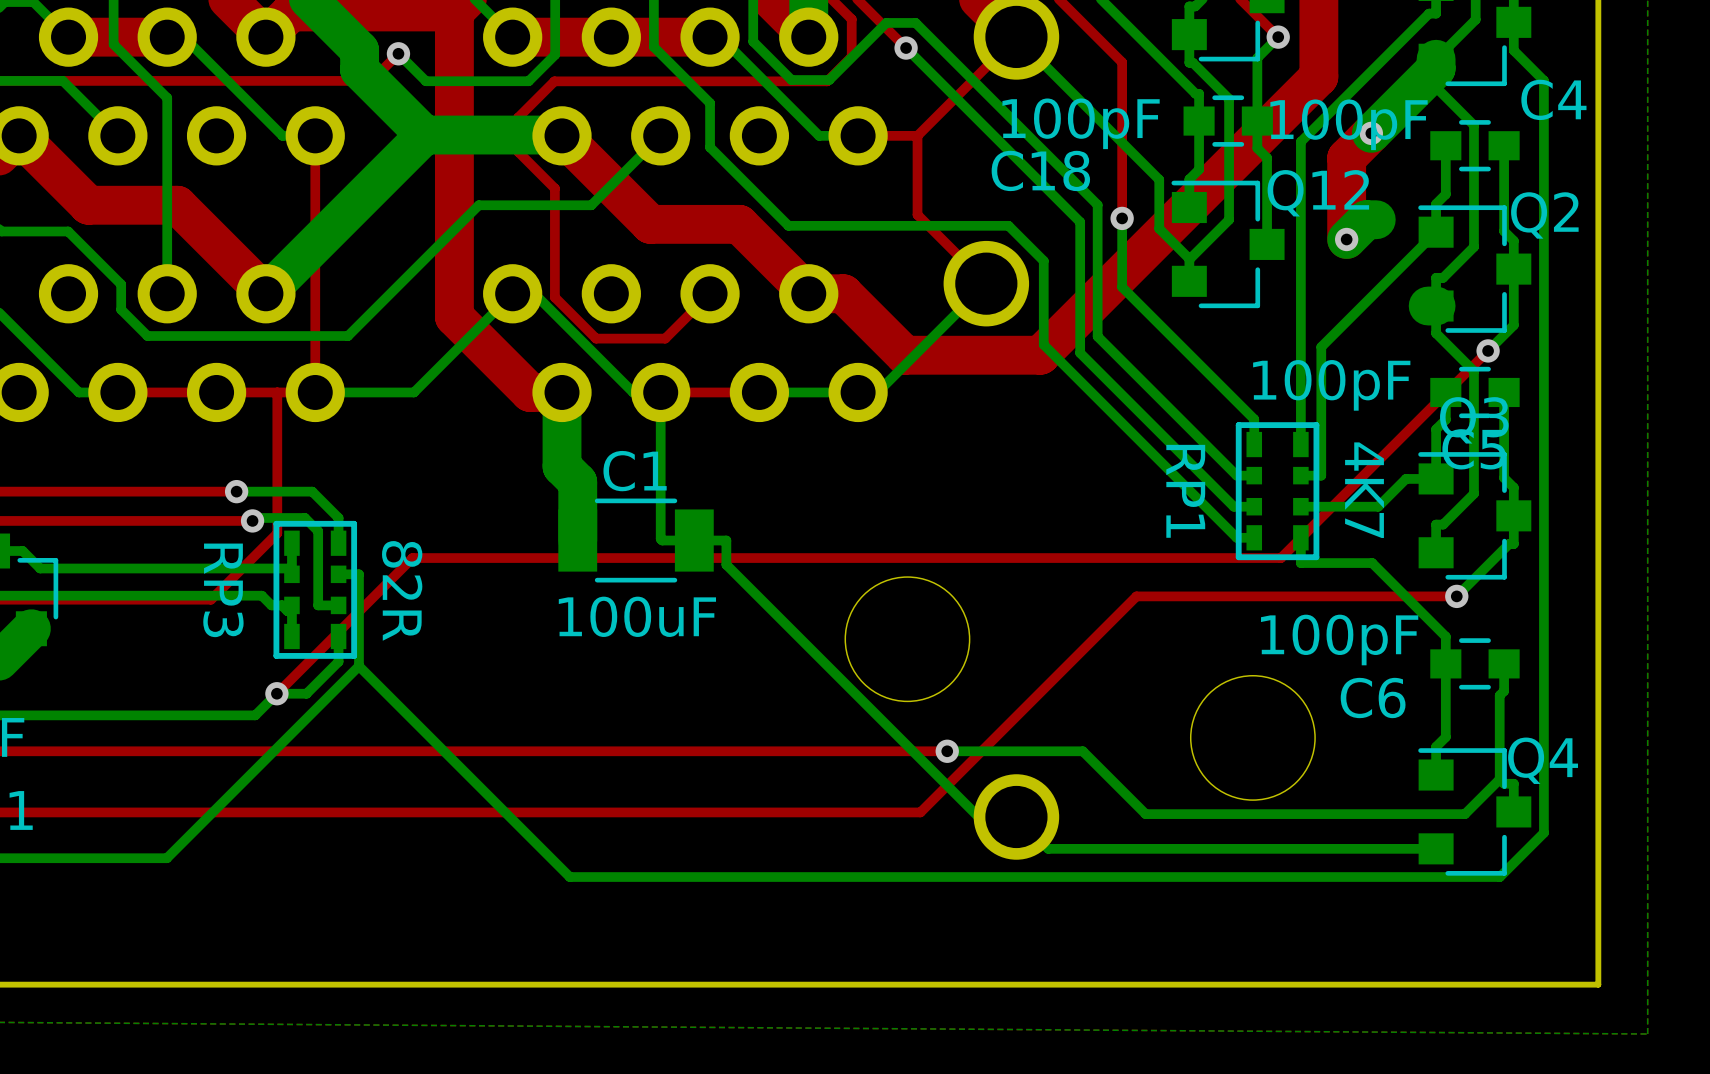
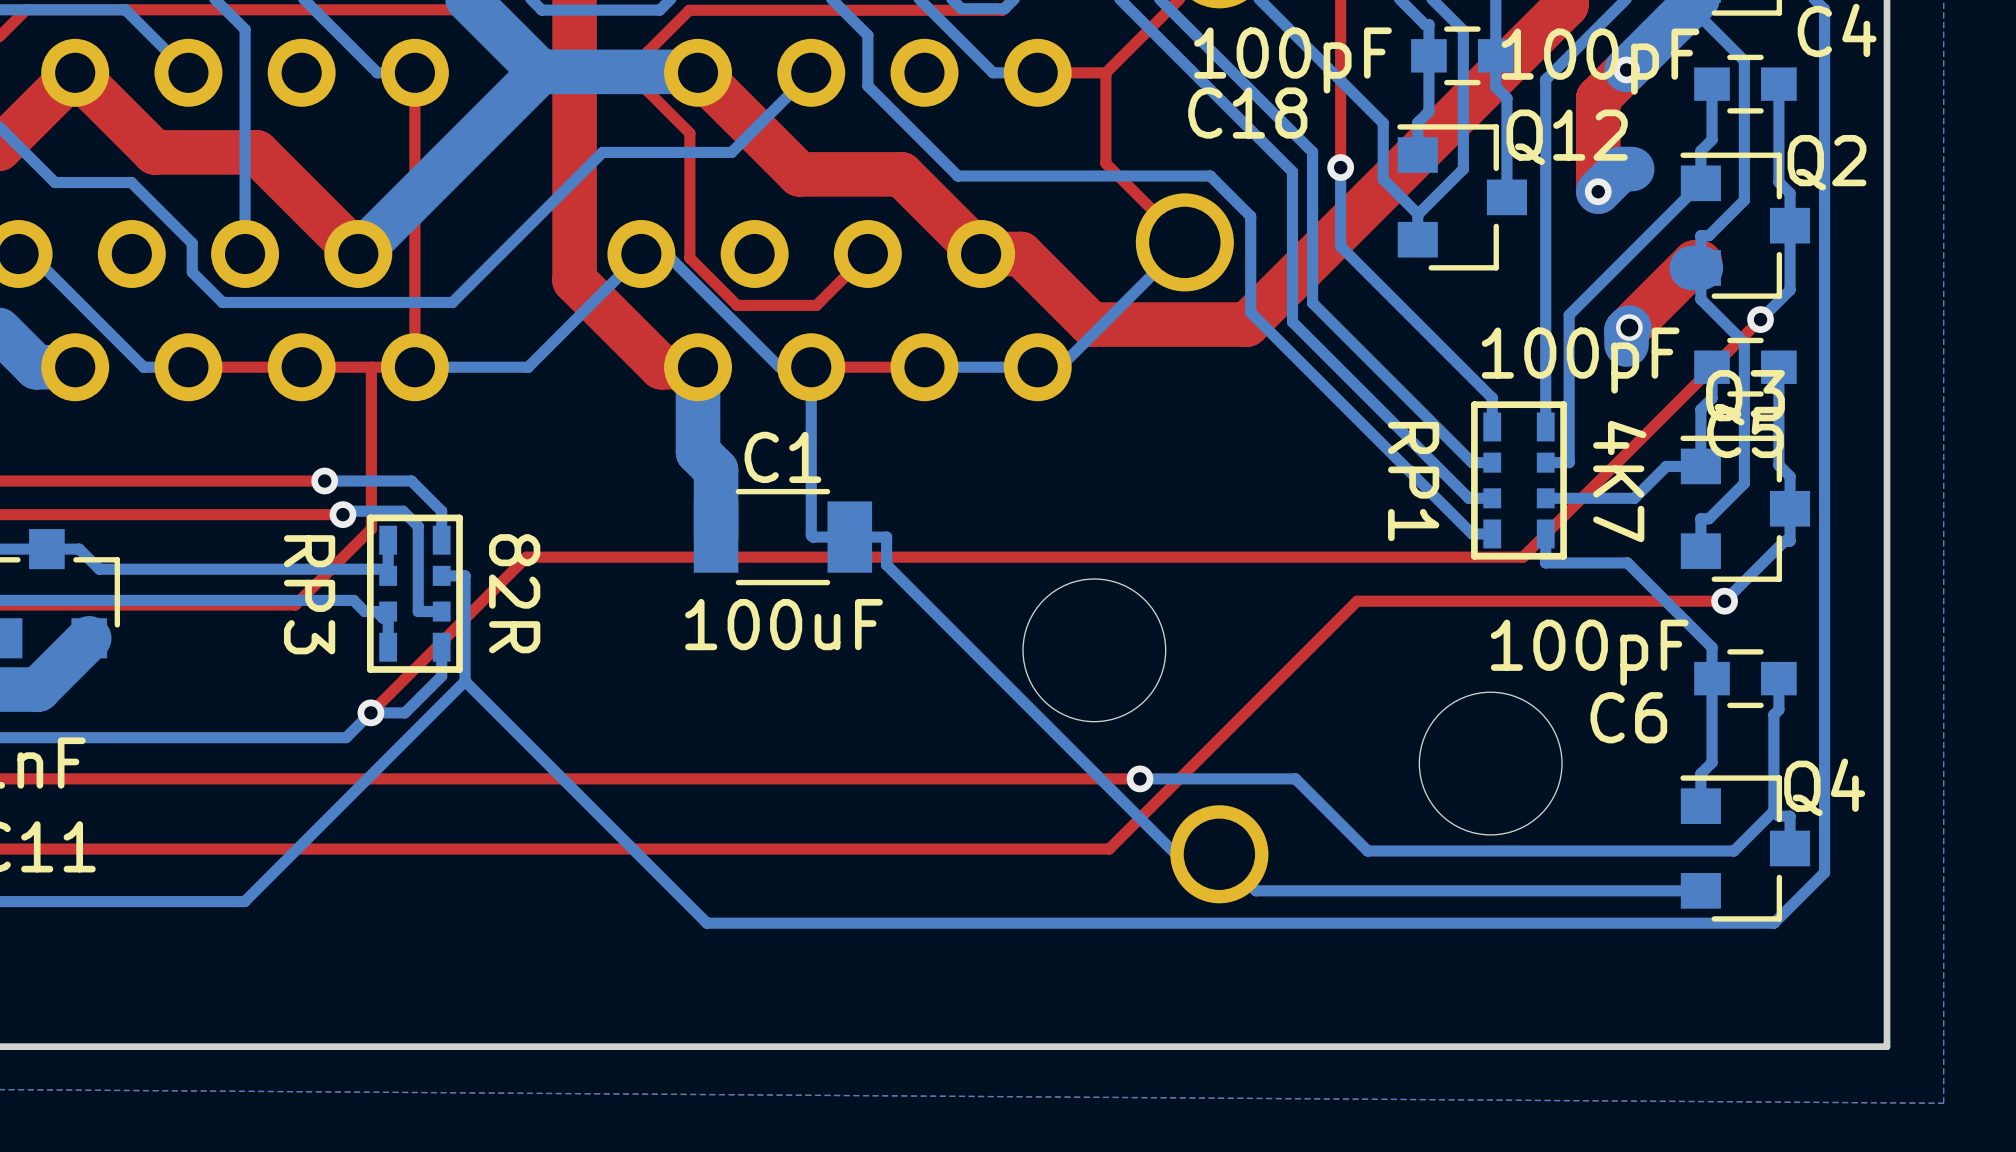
top track: none -> (1700, 262) (1694, 262) (1629, 327)
bottom track: none -> (1629, 327) (1626, 330) (1626, 344)
via: none -> (1629, 327)

